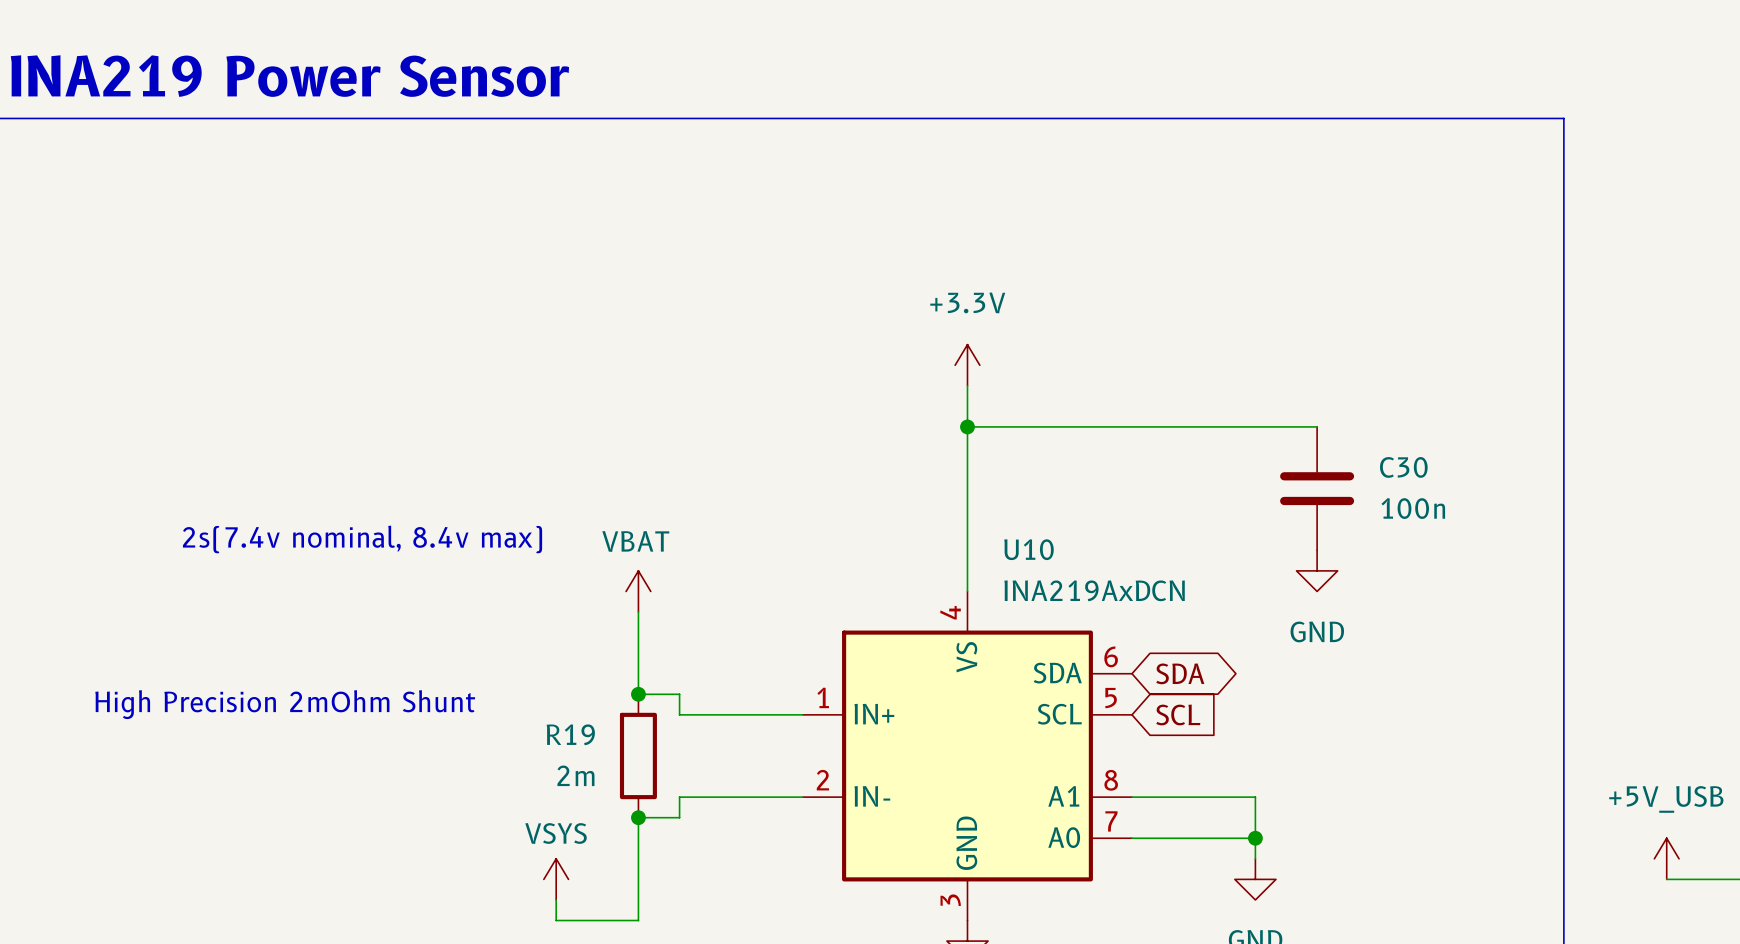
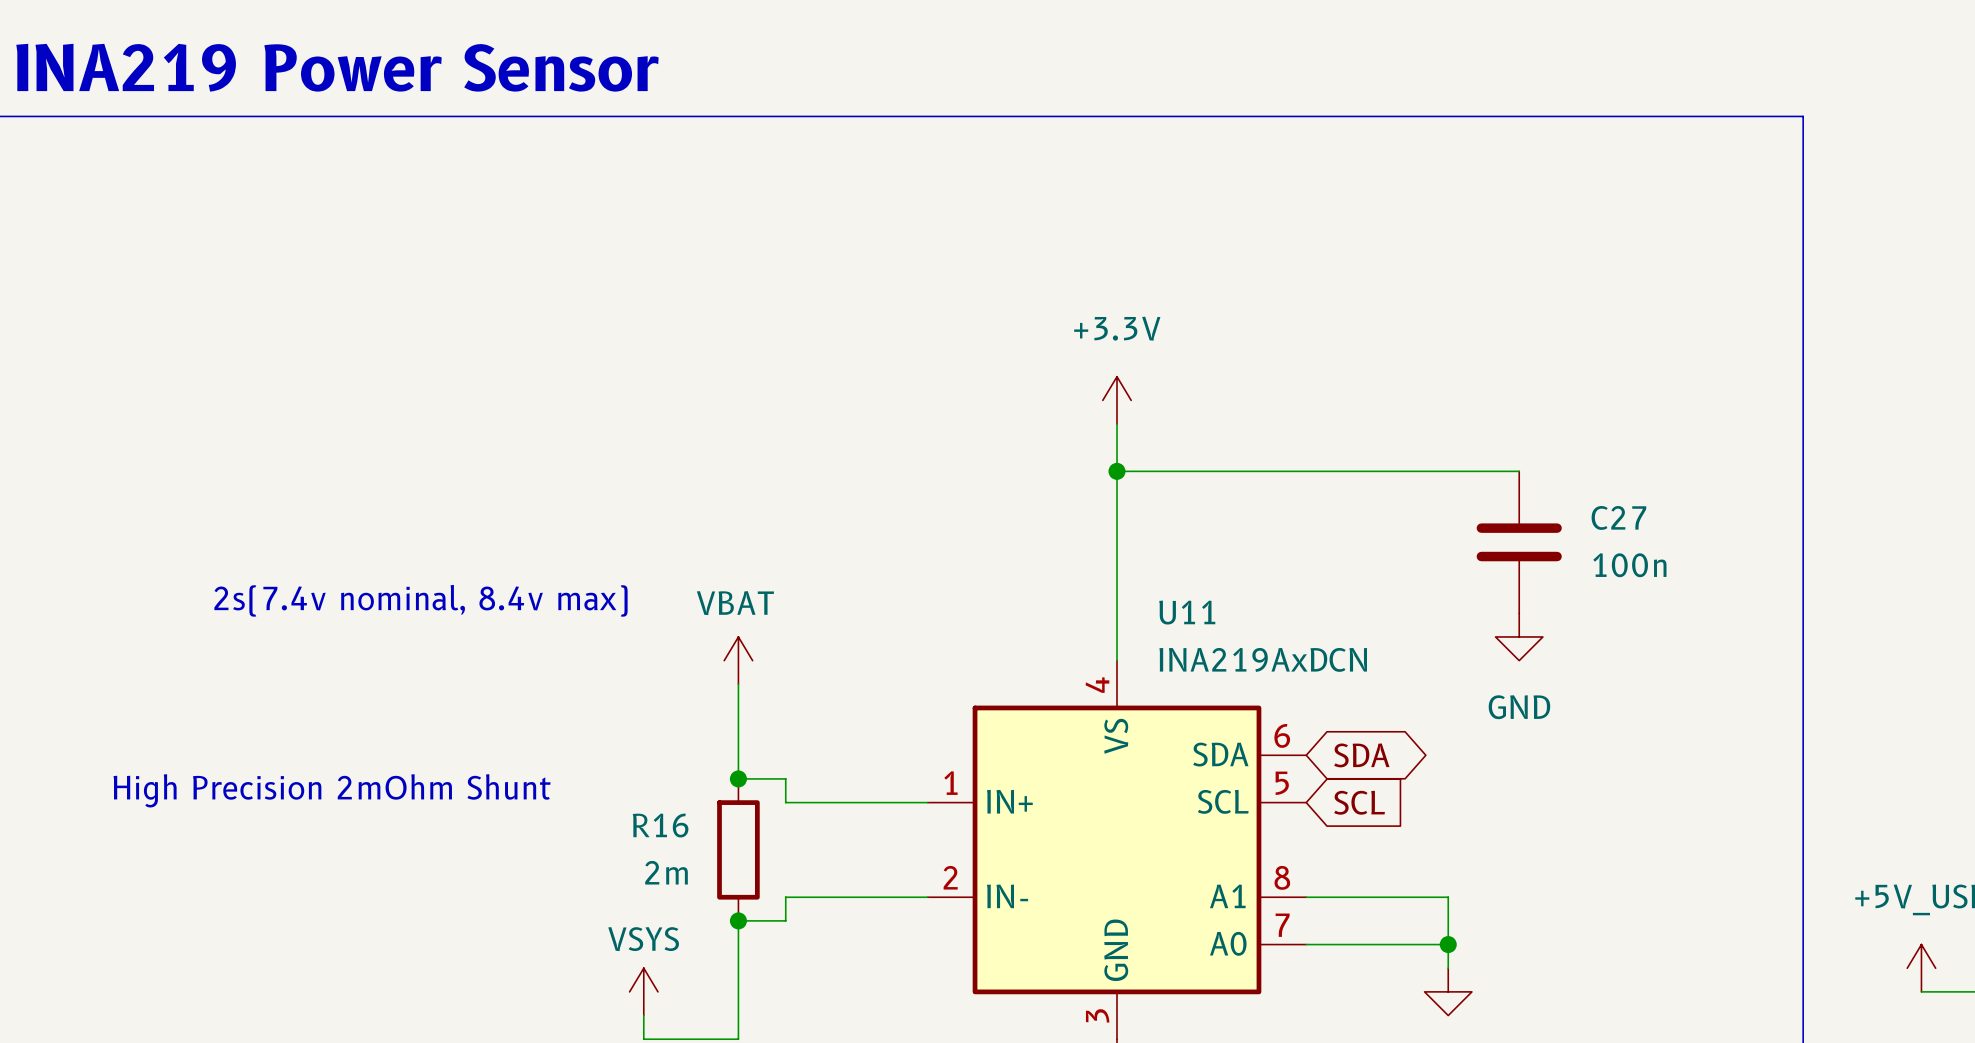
C30 name: C30 (1403, 467) -> C27 (1618, 517)
U10 name: U10 (1028, 549) -> U11 (1187, 612)
R19 name: R19 (570, 734) -> R16 (660, 825)

